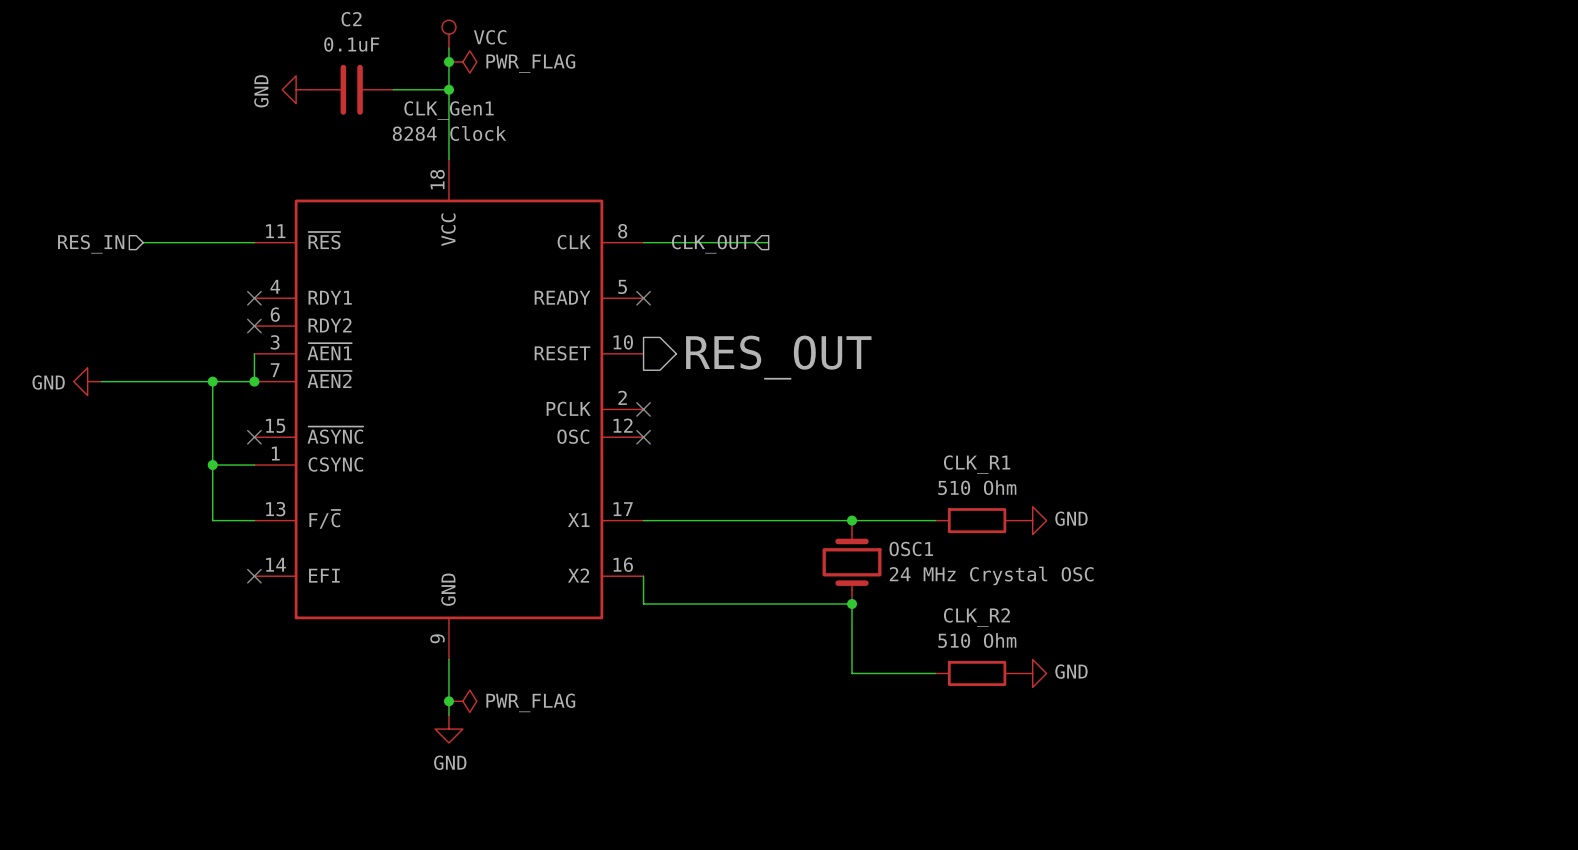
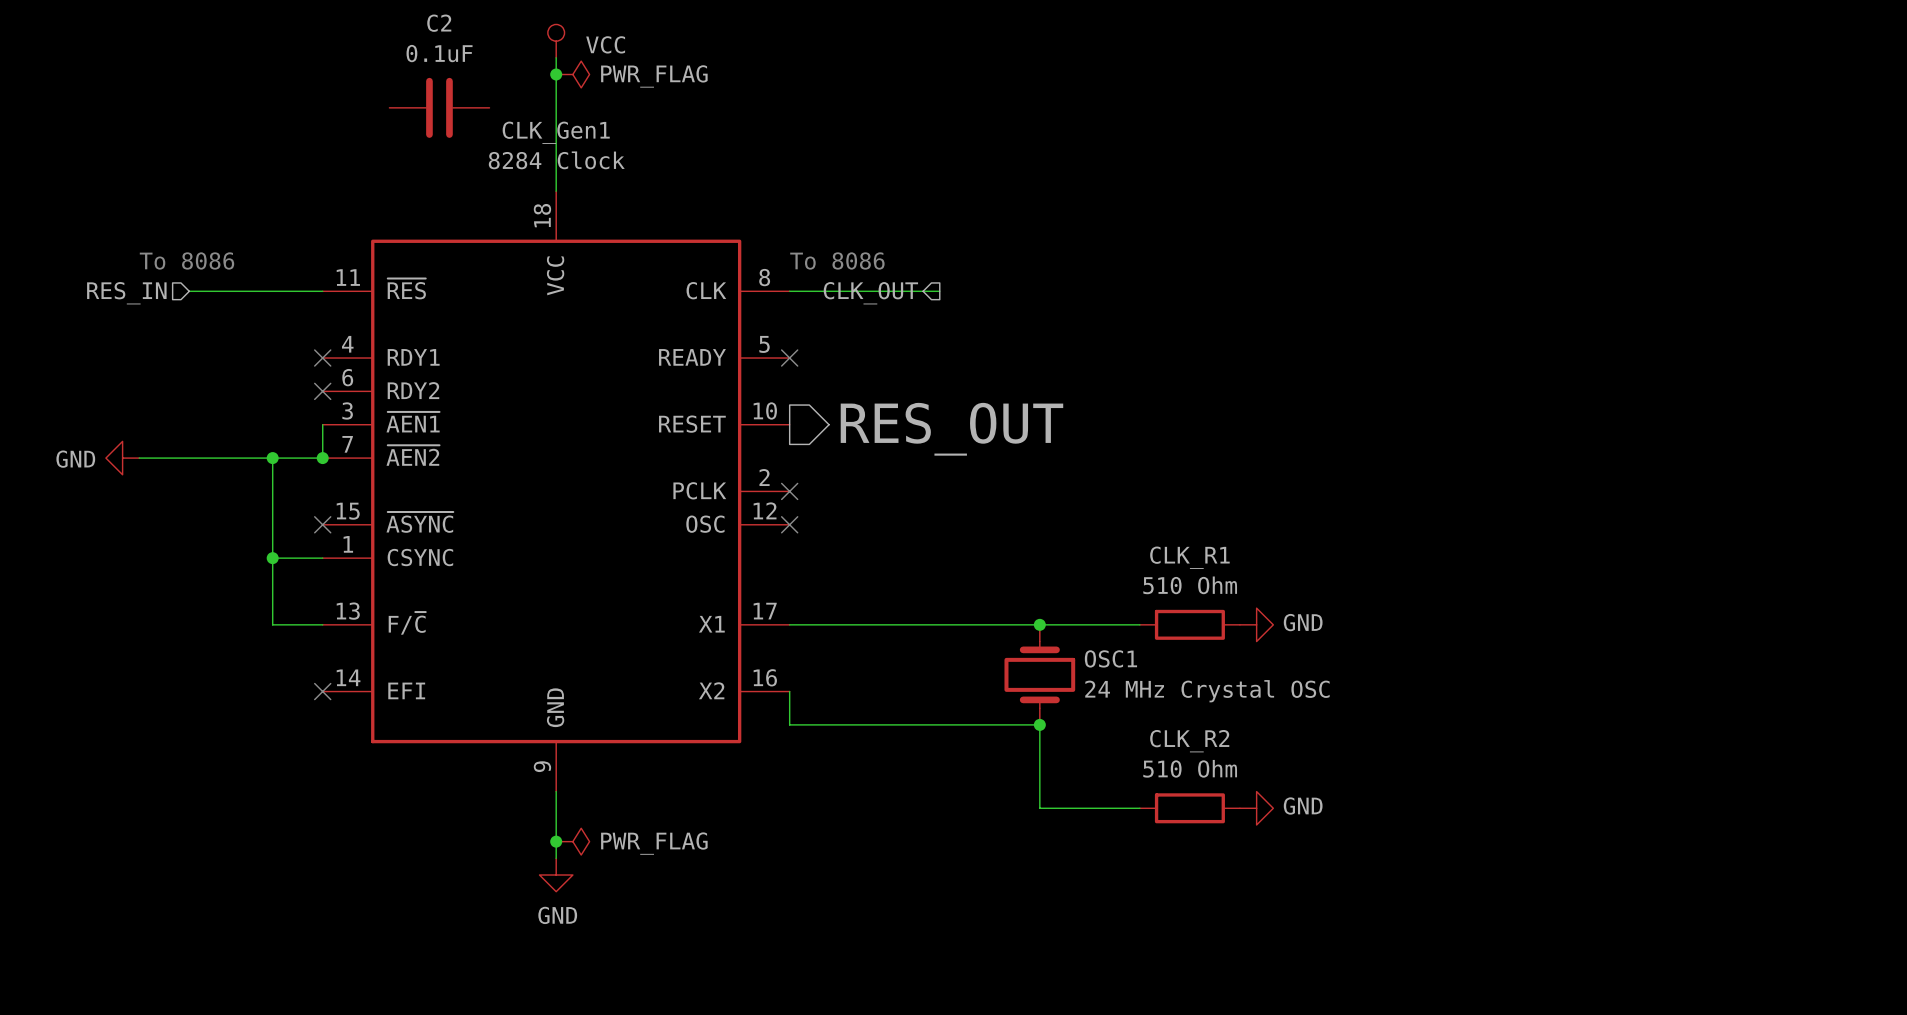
power symbol: GND (296, 89) -> none
wire: (393, 89) (448, 89) -> none
junction: (448, 89) -> none
text: none -> To 8086 (186, 260)
text: none -> To 8086 (837, 260)

